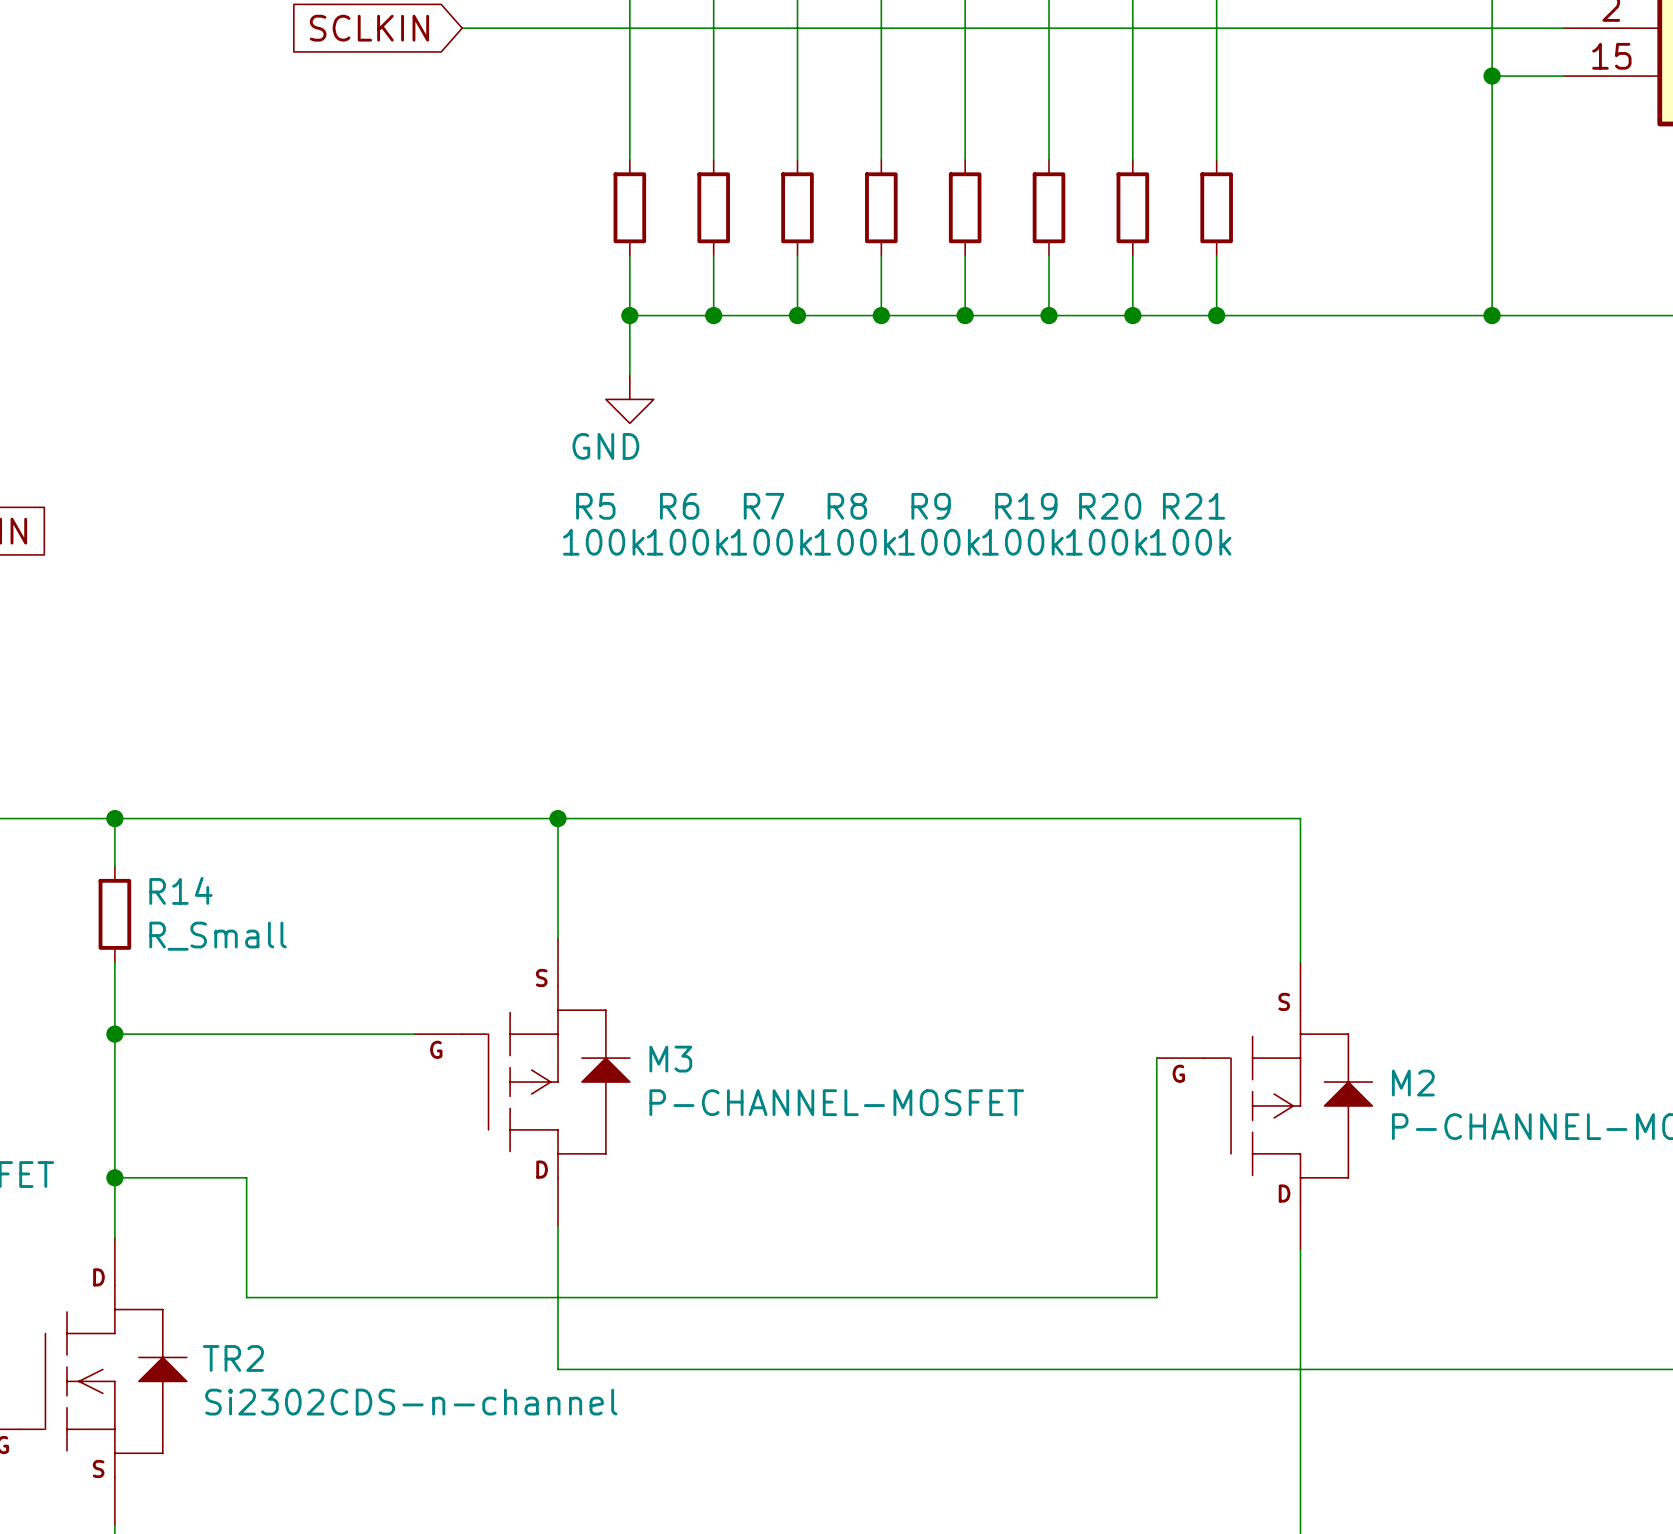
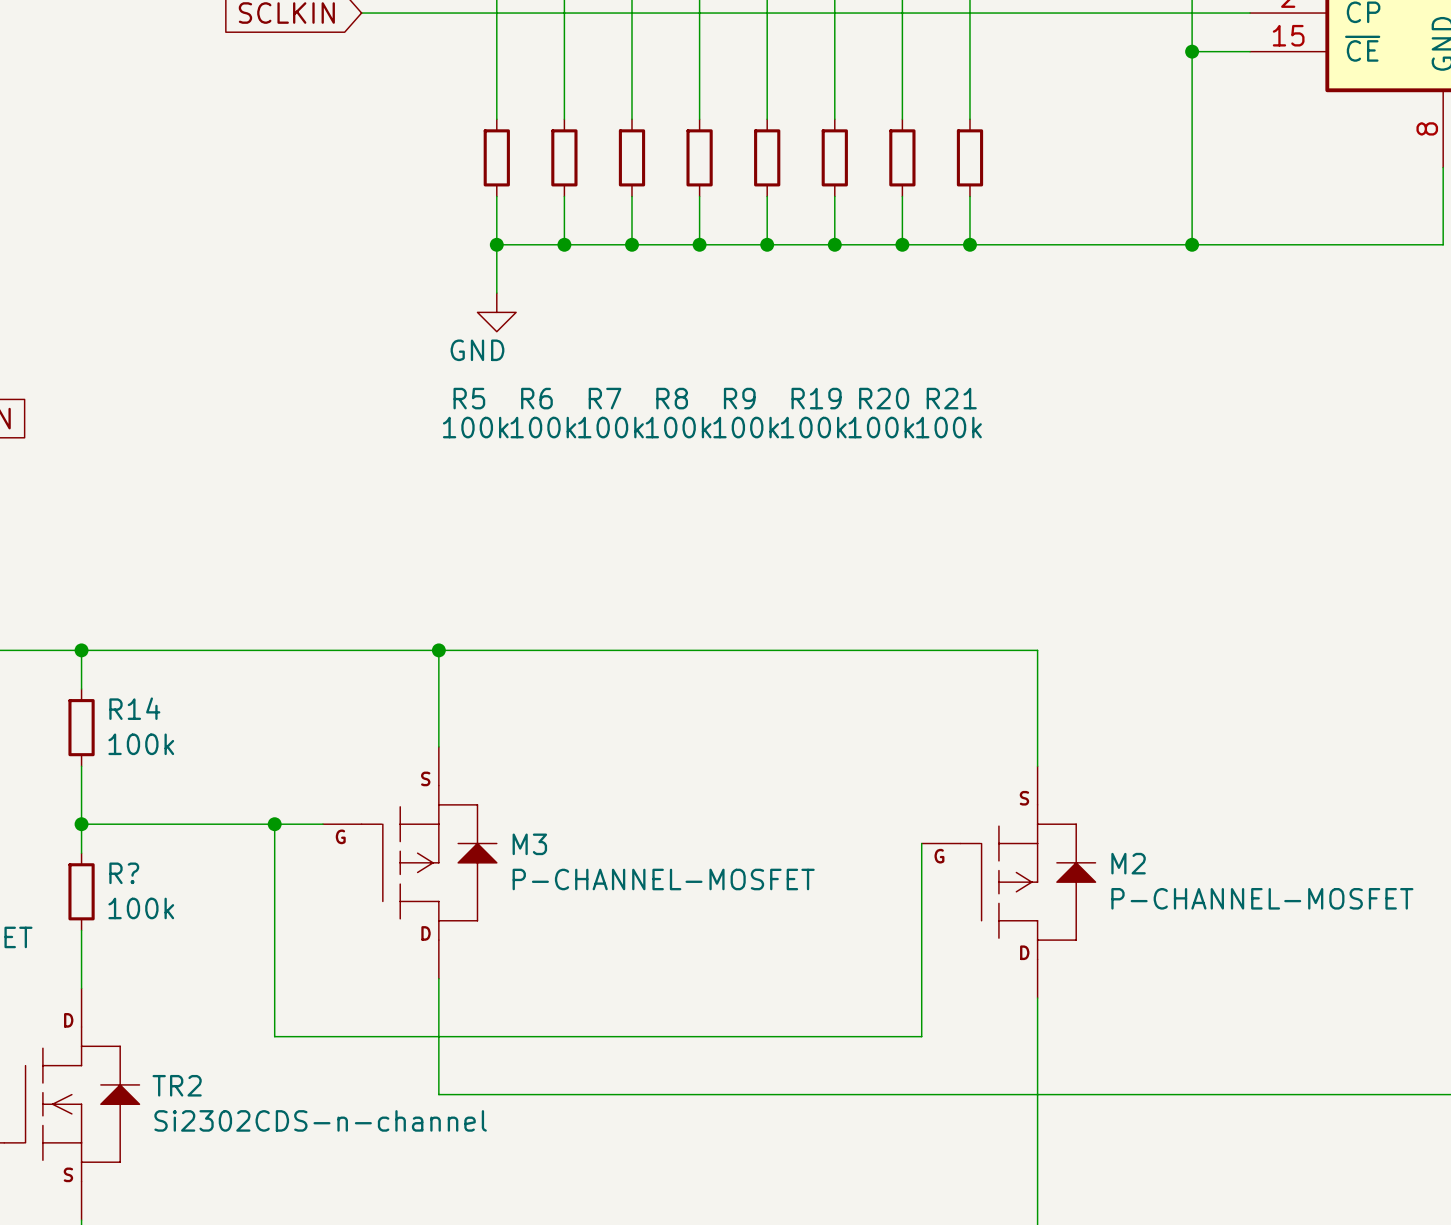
R14 value: R_Small (218, 936) -> 100k (141, 744)
junction: none -> (274, 824)
wire: (114, 1070) (114, 1165) -> none
R?: none -> 100k (81, 891)
wire: (114, 1177) (246, 1177) (246, 1297) (354, 1297) -> (274, 824) (274, 1036)
junction: (114, 1177) -> none

